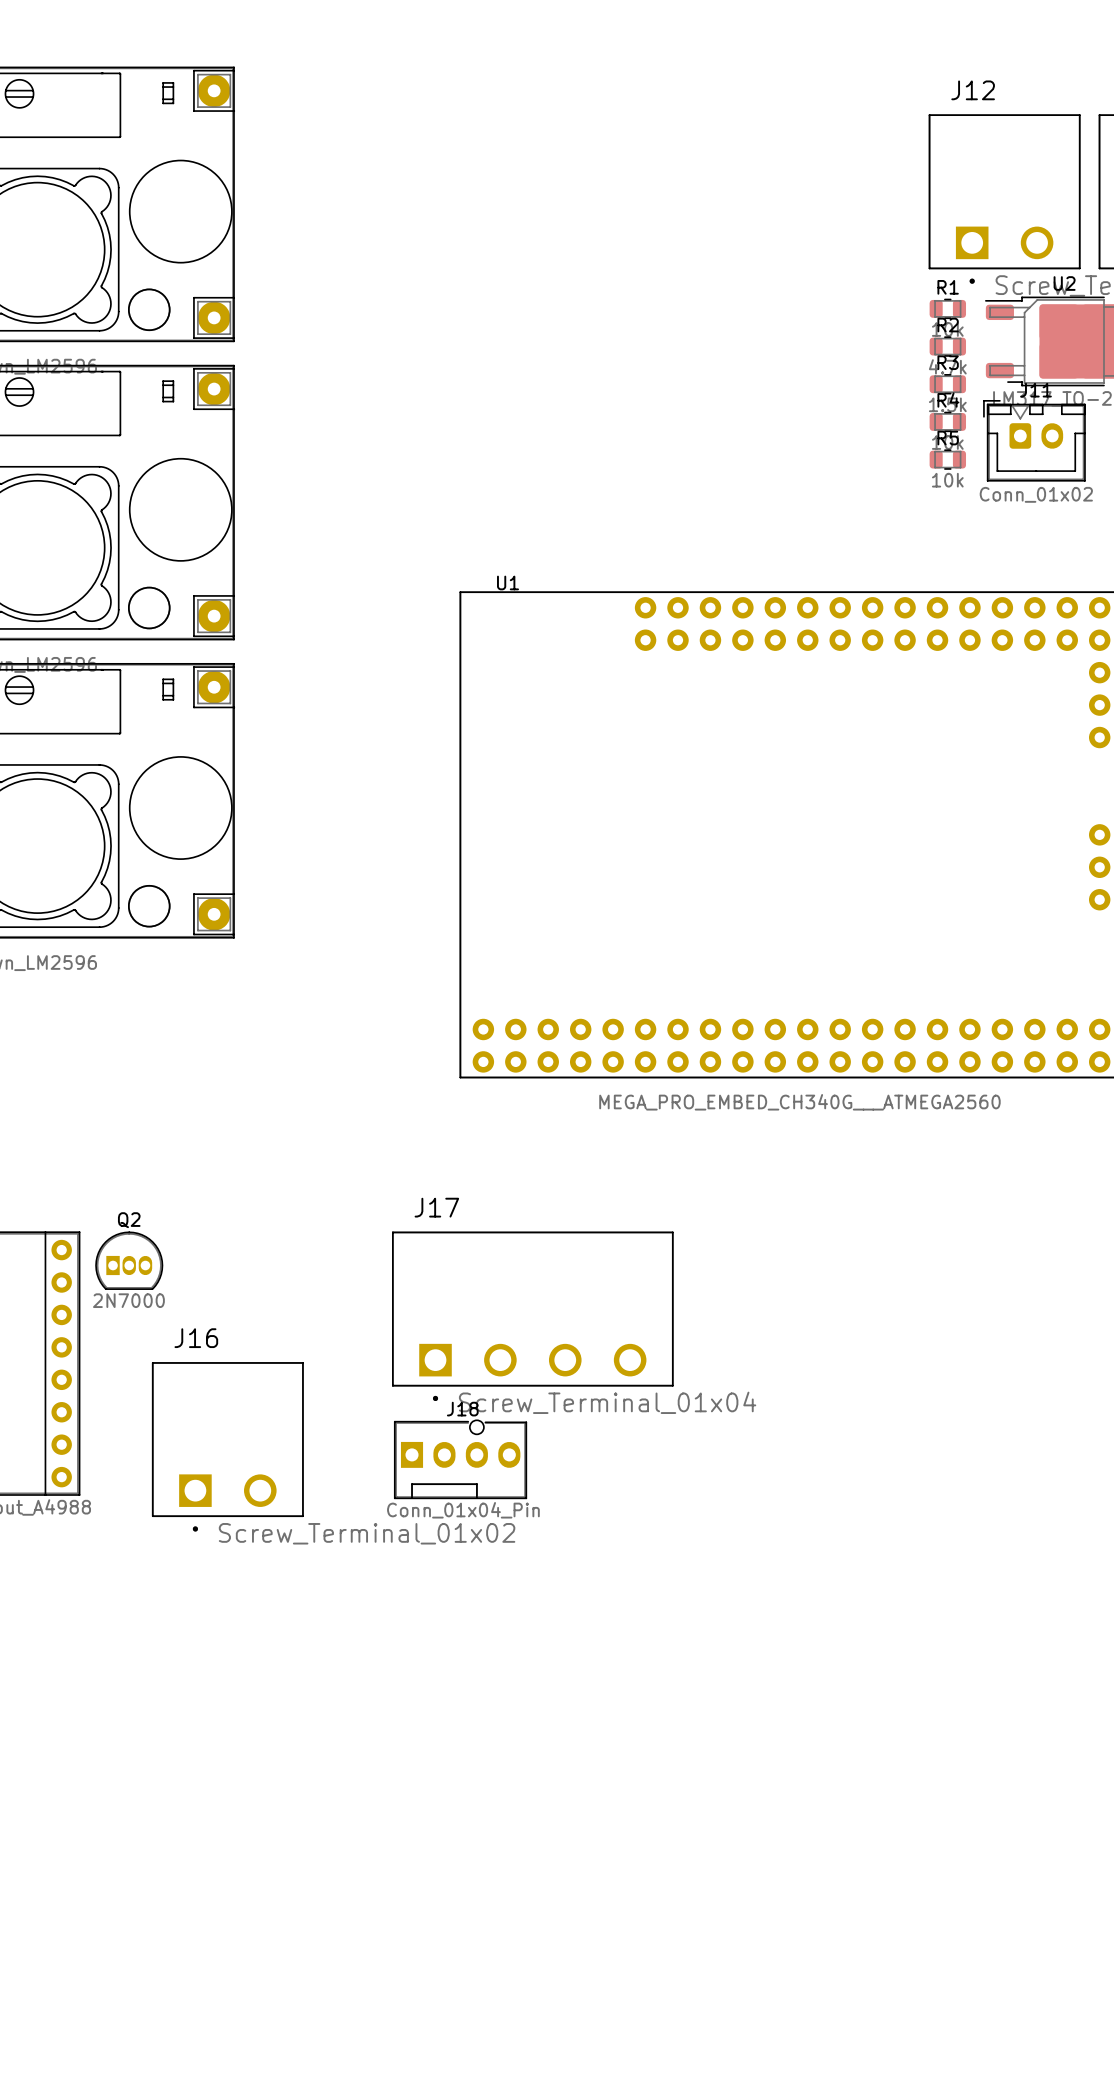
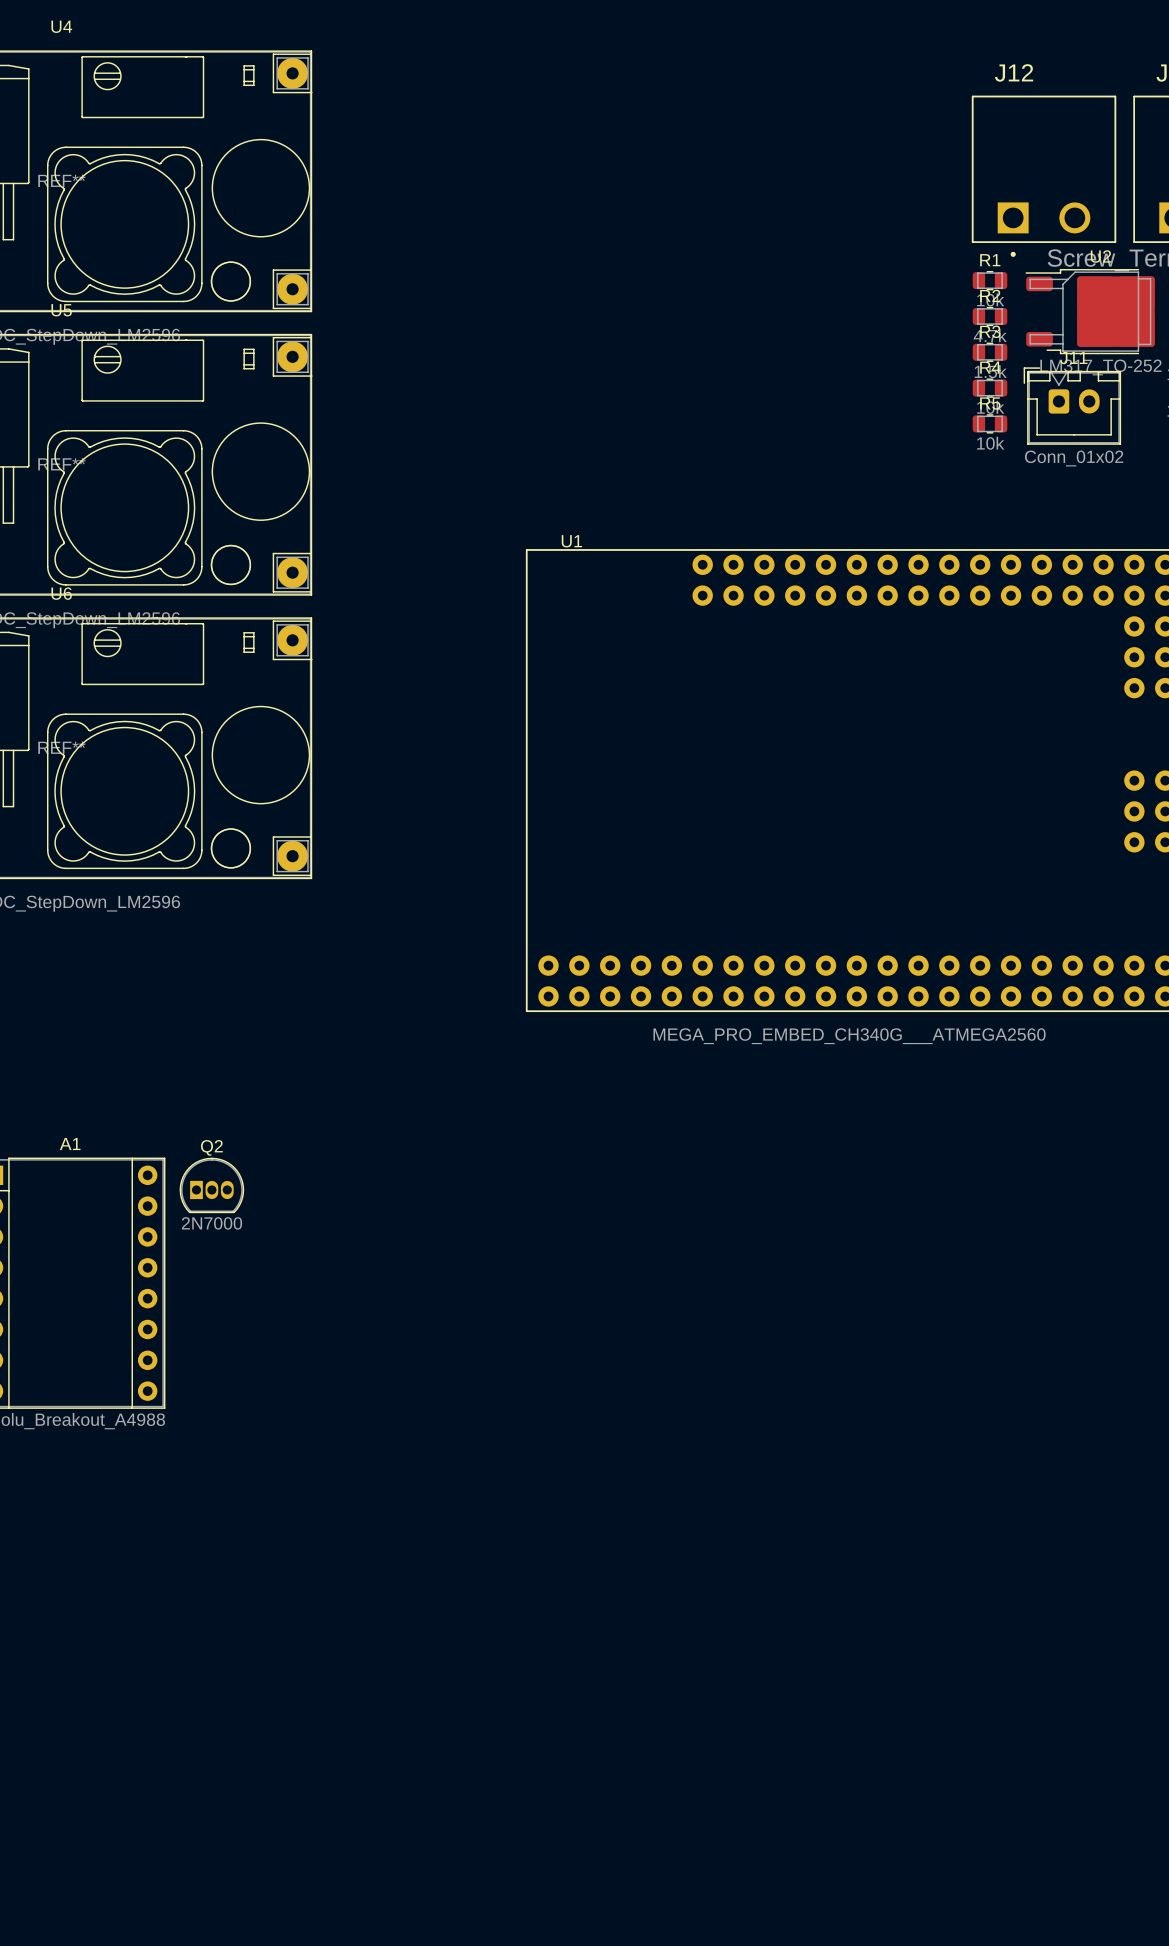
J17: Screw_Terminal_01x04 (532, 1316) -> none
J16: Screw_Terminal_01x02 (227, 1446) -> none
J18: Conn_01x04_Pin (460, 1459) -> none

